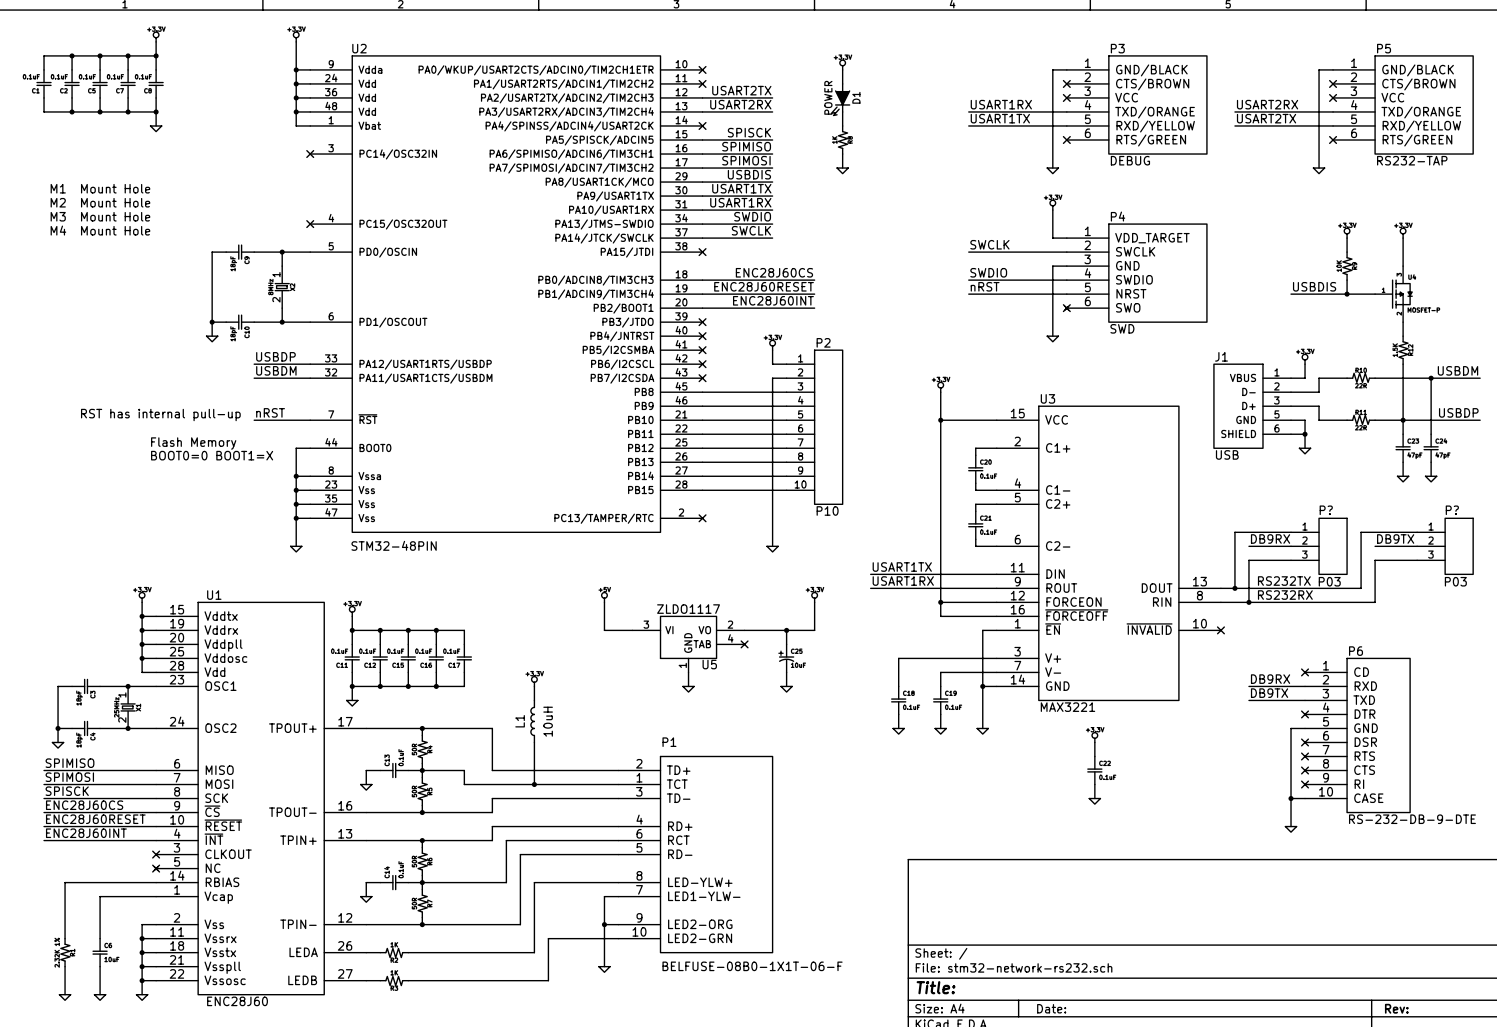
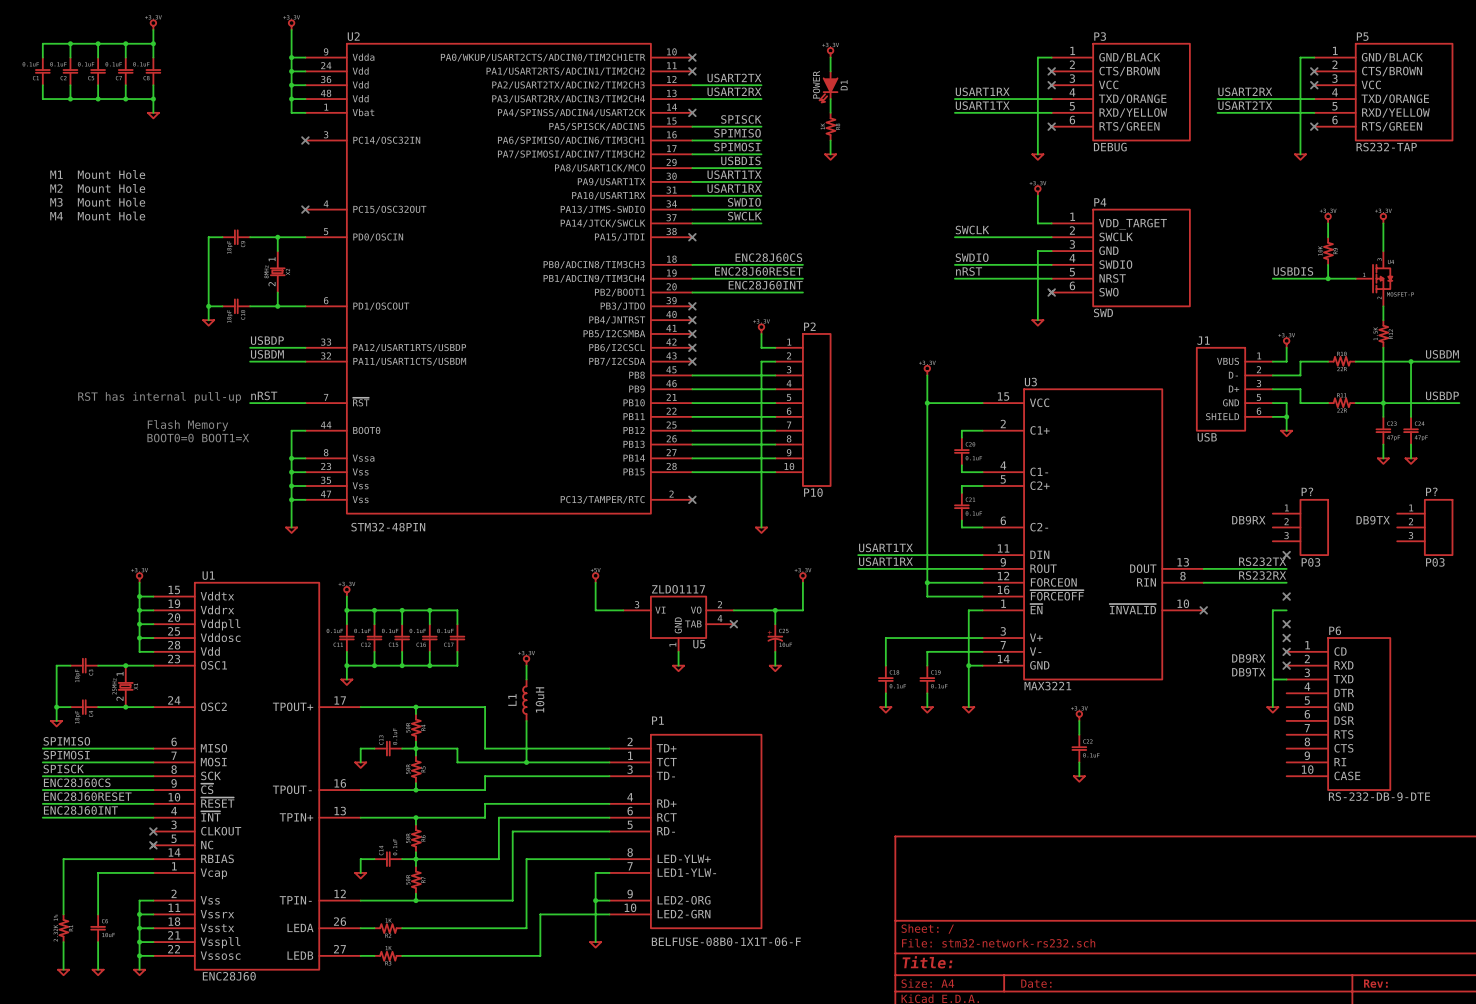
wire: (1291, 532) (1234, 532) (1234, 588) -> none
wire: (1417, 532) (1361, 532) (1361, 588) (1305, 588) -> none
wire: (1248, 546) (1291, 546) -> none
wire: (1375, 546) (1417, 546) -> none
wire: (1291, 560) (1248, 560) (1248, 602) -> none
wire: (1417, 560) (1375, 560) (1375, 602) (1305, 602) -> none
no-connect mark: none -> (1286, 555)
junction: (1234, 588) -> none
junction: (1248, 602) -> none
no-connect mark: none -> (1286, 596)
no-connect mark: none -> (1286, 624)
no-connect mark: none -> (1286, 638)
wire: (1248, 686) (1305, 686) -> none
no-connect mark: none -> (1286, 665)
wire: (1248, 700) (1291, 700) -> none
no-connect mark: (1305, 714) -> none
wire: (1305, 728) (1291, 728) (1291, 826) -> (1286, 610) (1272, 610) (1272, 707)
no-connect mark: (1305, 742) -> none
no-connect mark: (1305, 756) -> none
no-connect mark: (1305, 770) -> none
no-connect mark: (1305, 784) -> none
wire: (1291, 798) (1305, 798) -> none
junction: (1291, 798) -> none
power symbol position: (1291, 829) -> (1272, 709)

